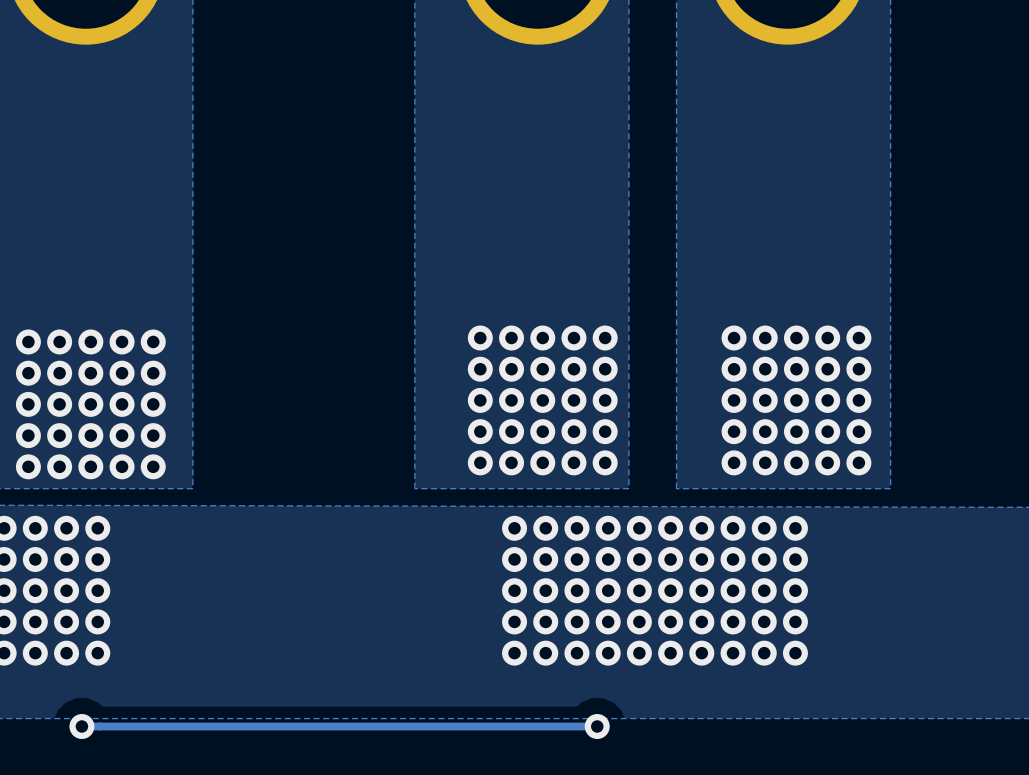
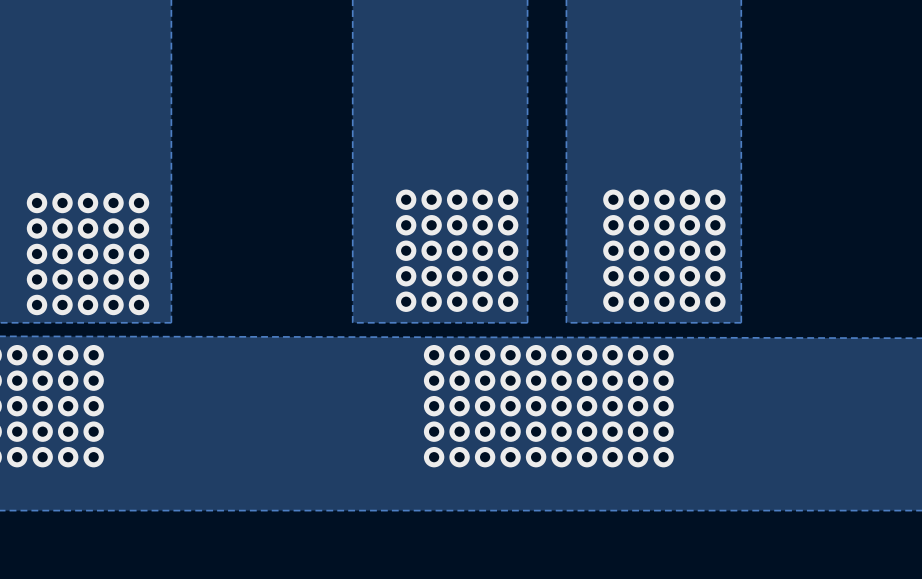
via: (81, 726) -> none
track: (597, 726) (81, 726) -> none
via: (597, 726) -> none

